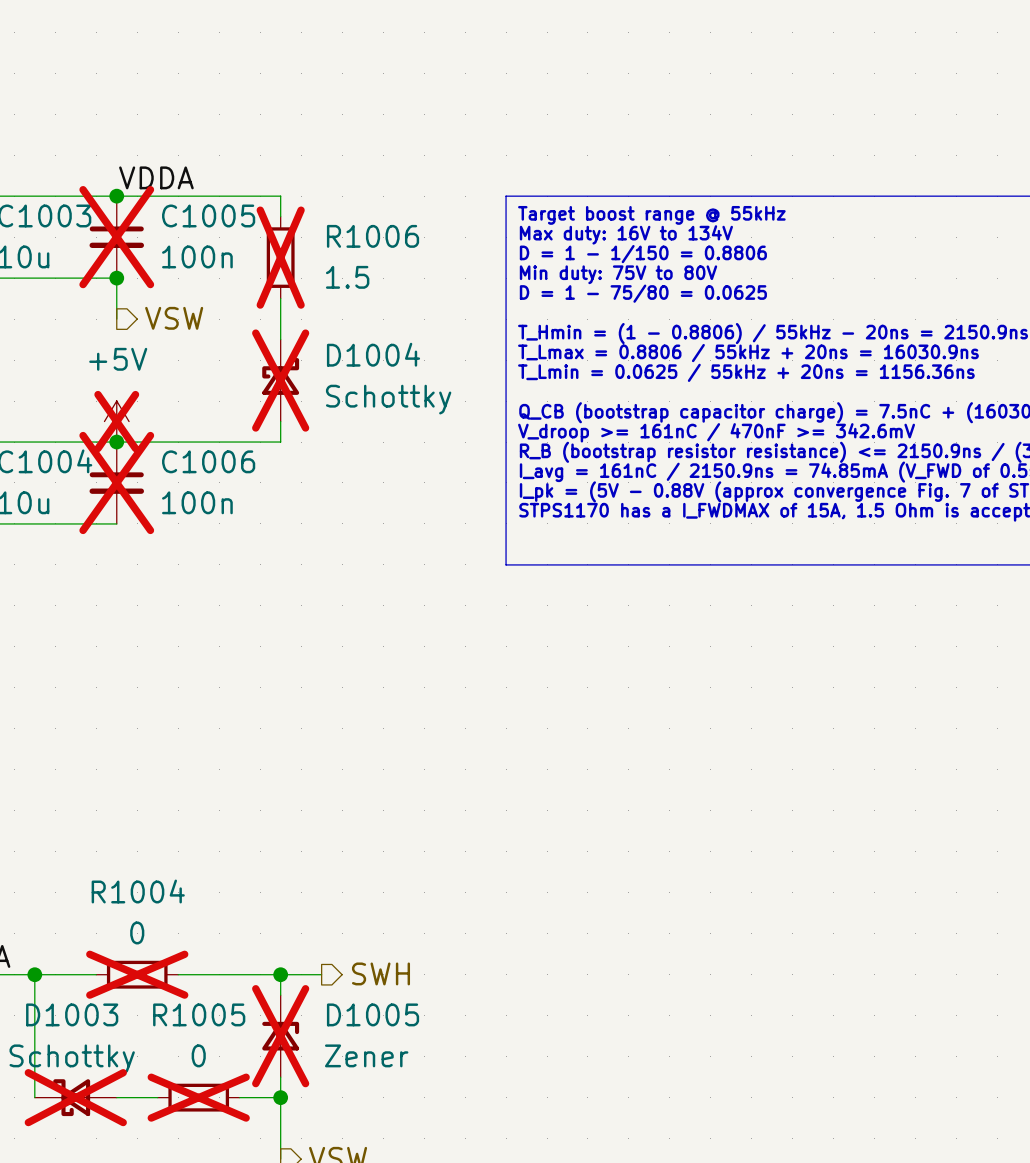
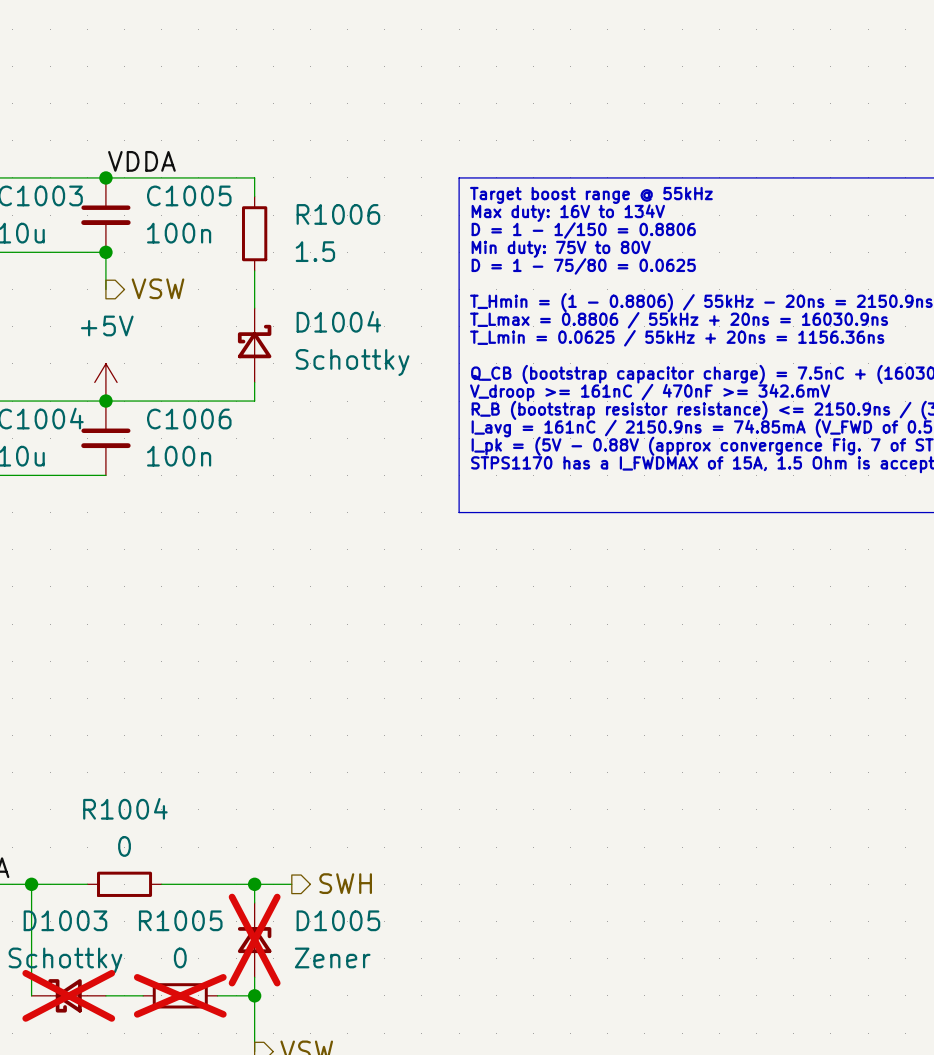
C1005 do-not-place cross: (116, 237) -> none
R1006 do-not-place cross: (280, 257) -> none
D1004 do-not-place cross: (280, 380) -> none
power symbol do-not-place cross: (116, 421) -> none
C1006 do-not-place cross: (116, 482) -> none
R1004 do-not-place cross: (137, 974) -> none

